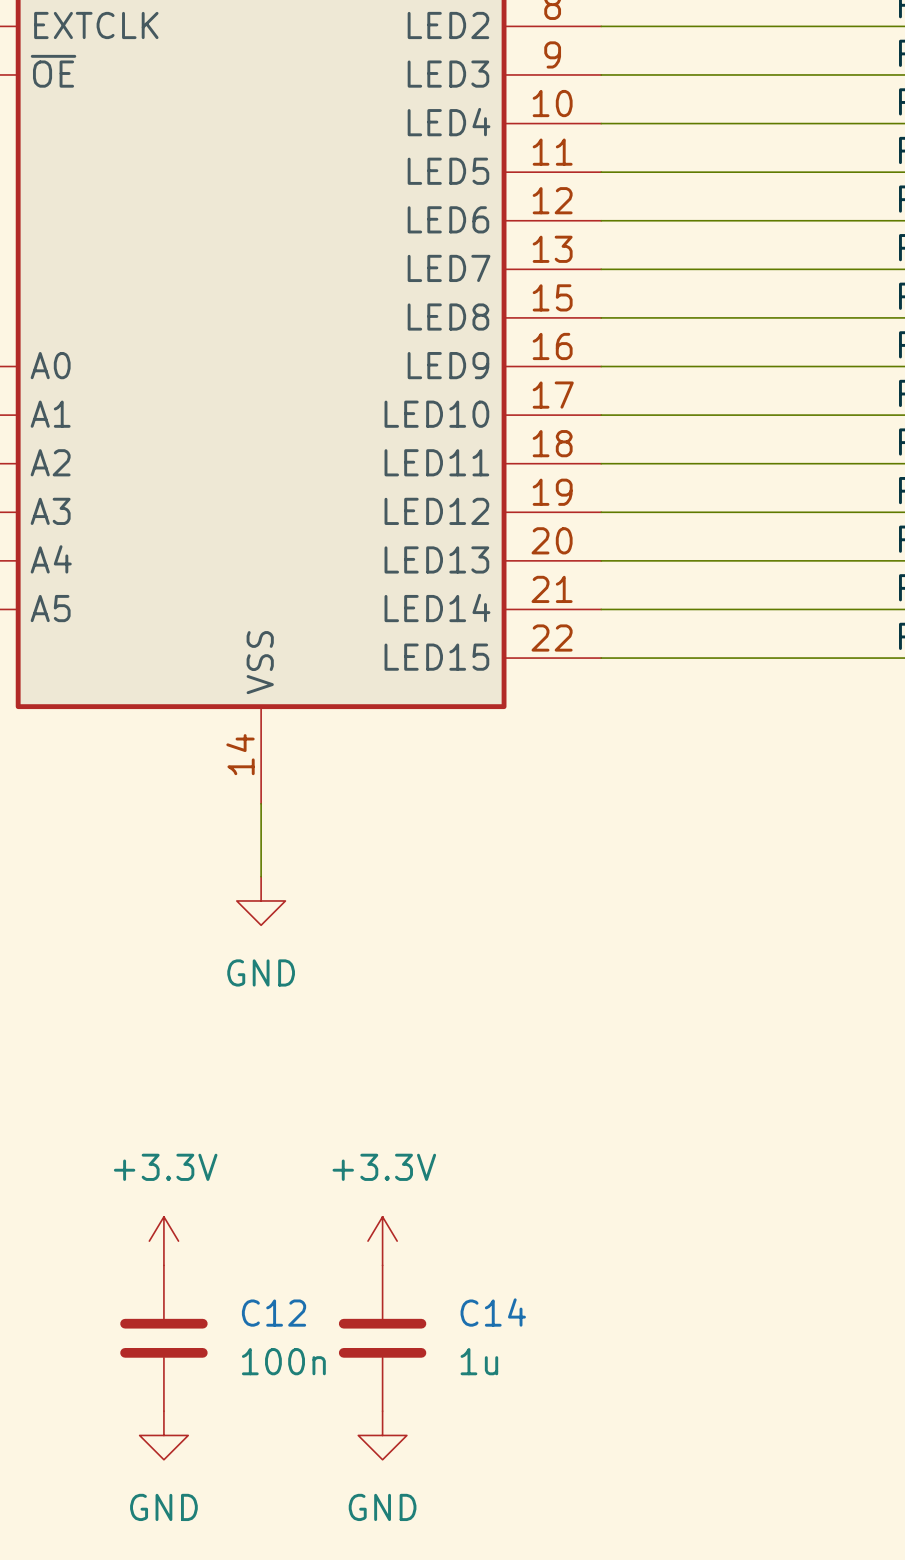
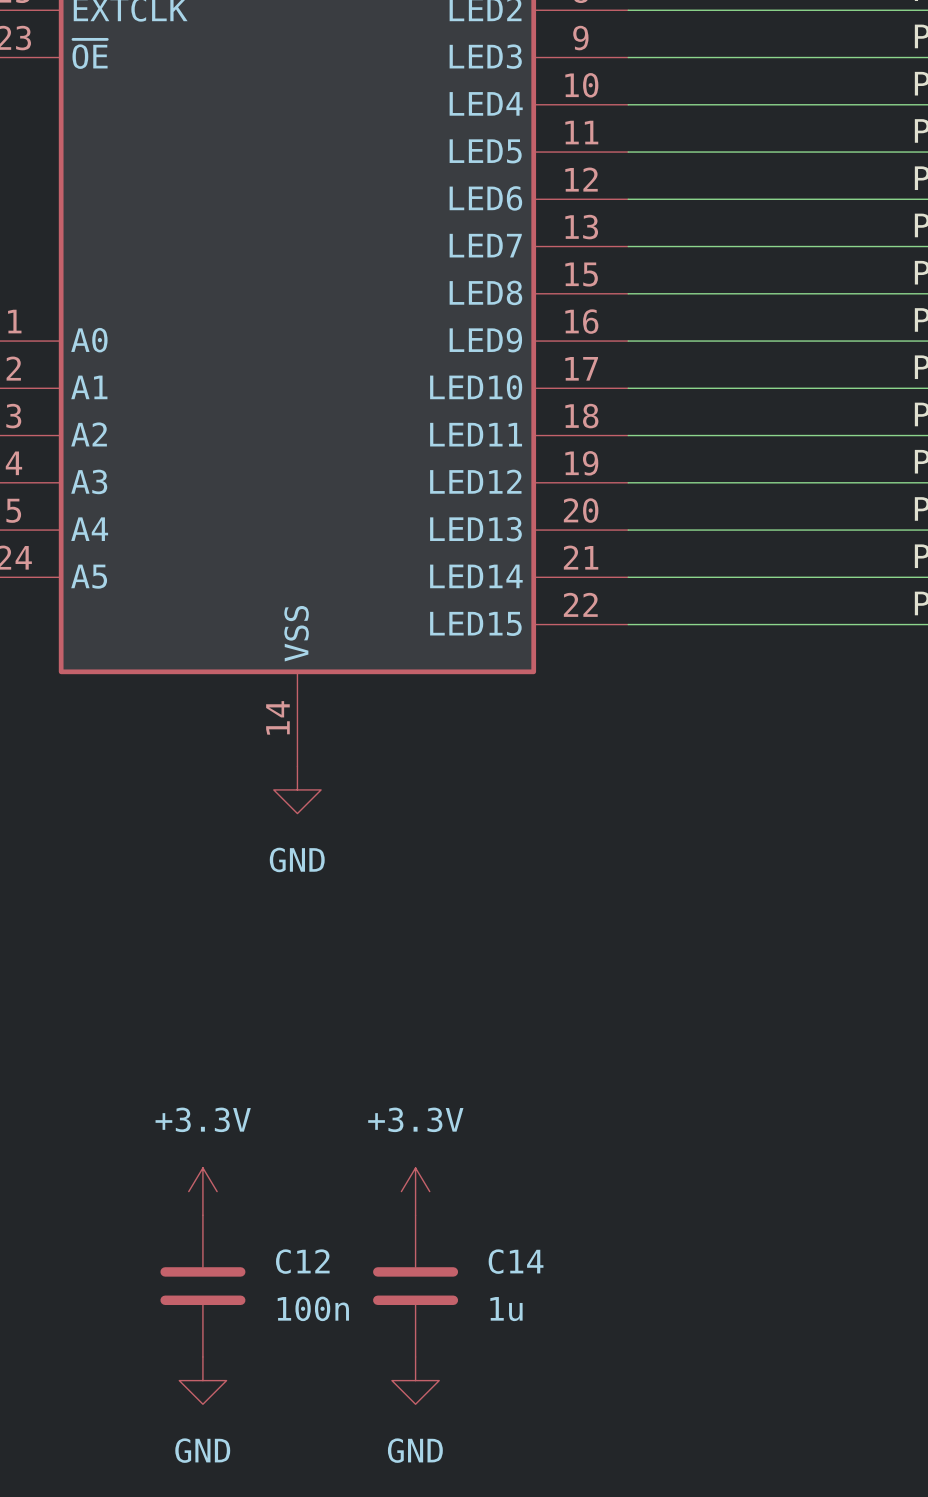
wire: (261, 803) (261, 876) -> none
power symbol position: GND (261, 900) -> GND (297, 789)

